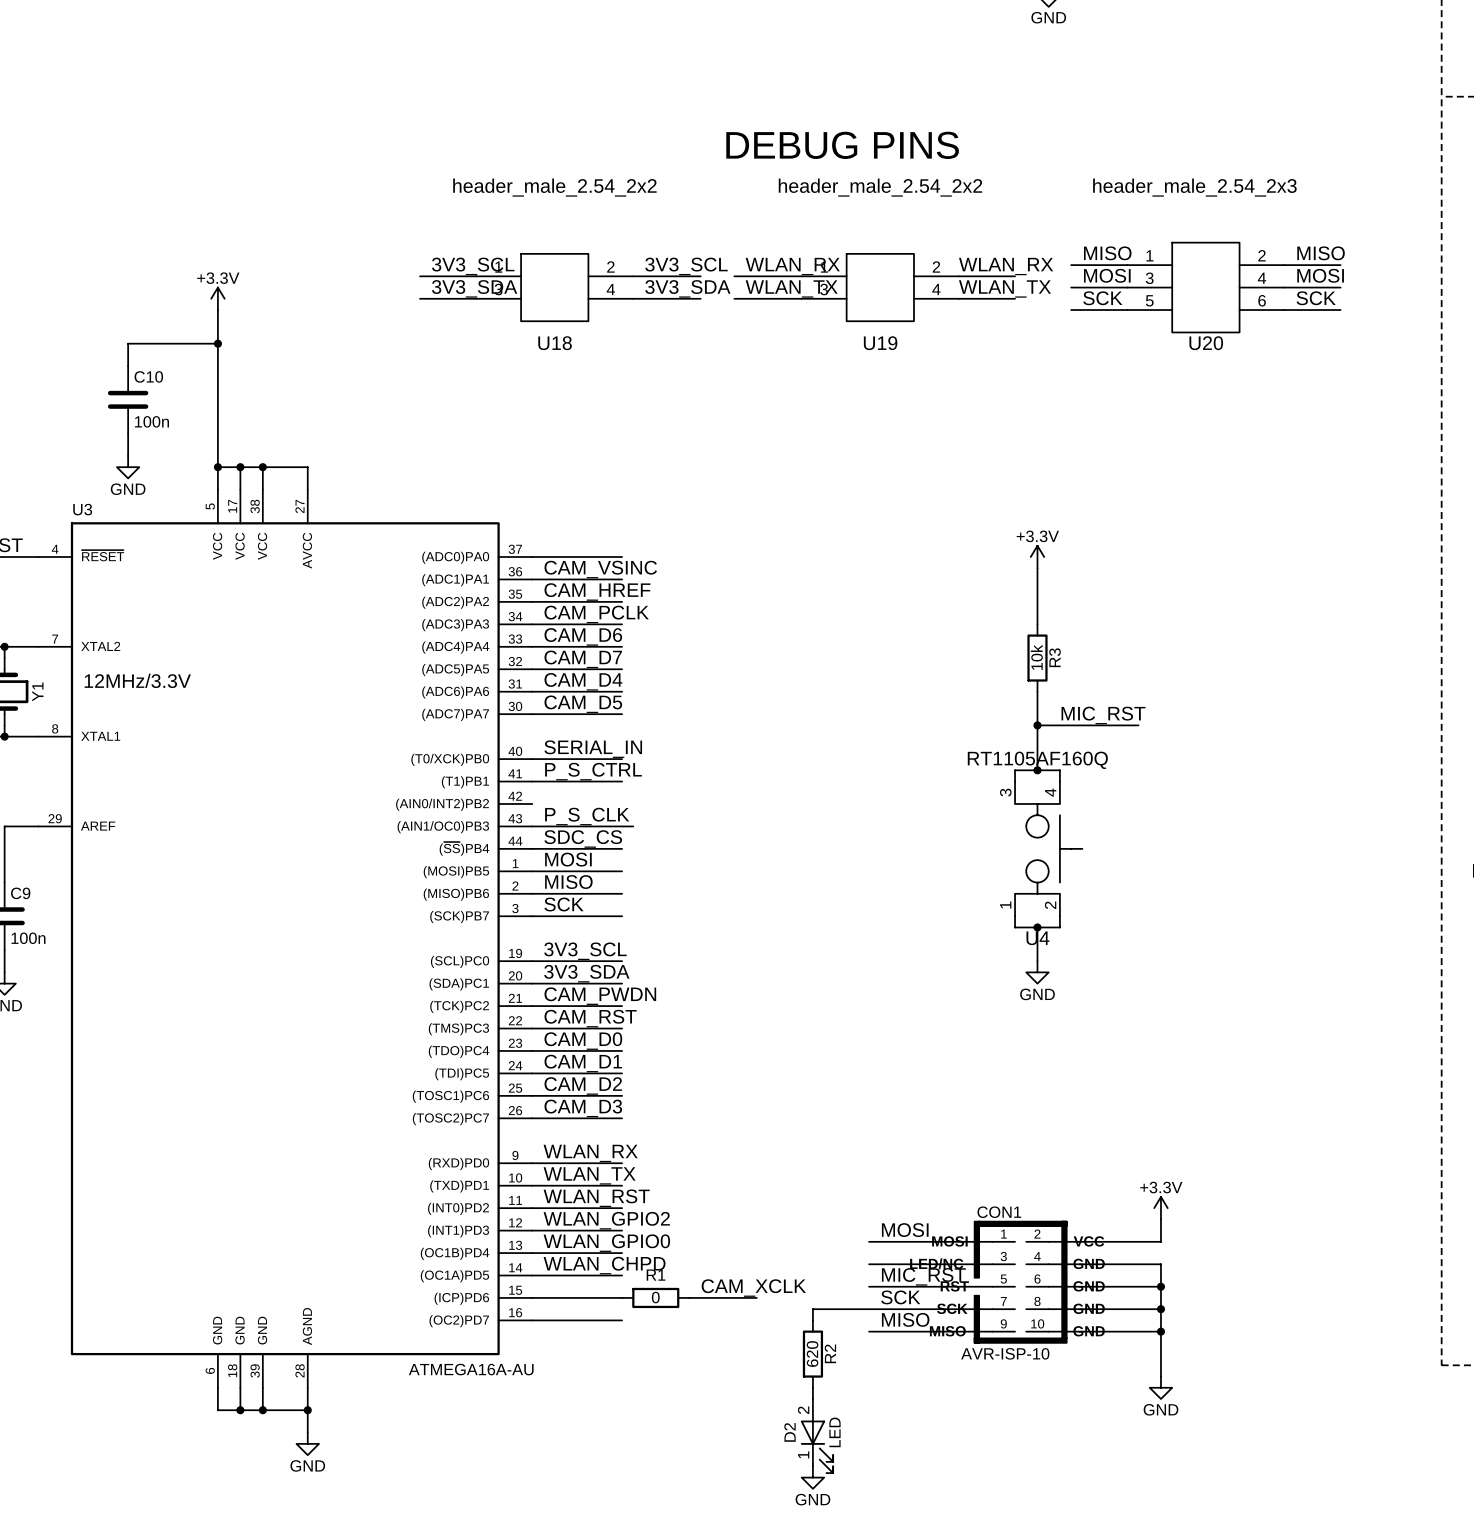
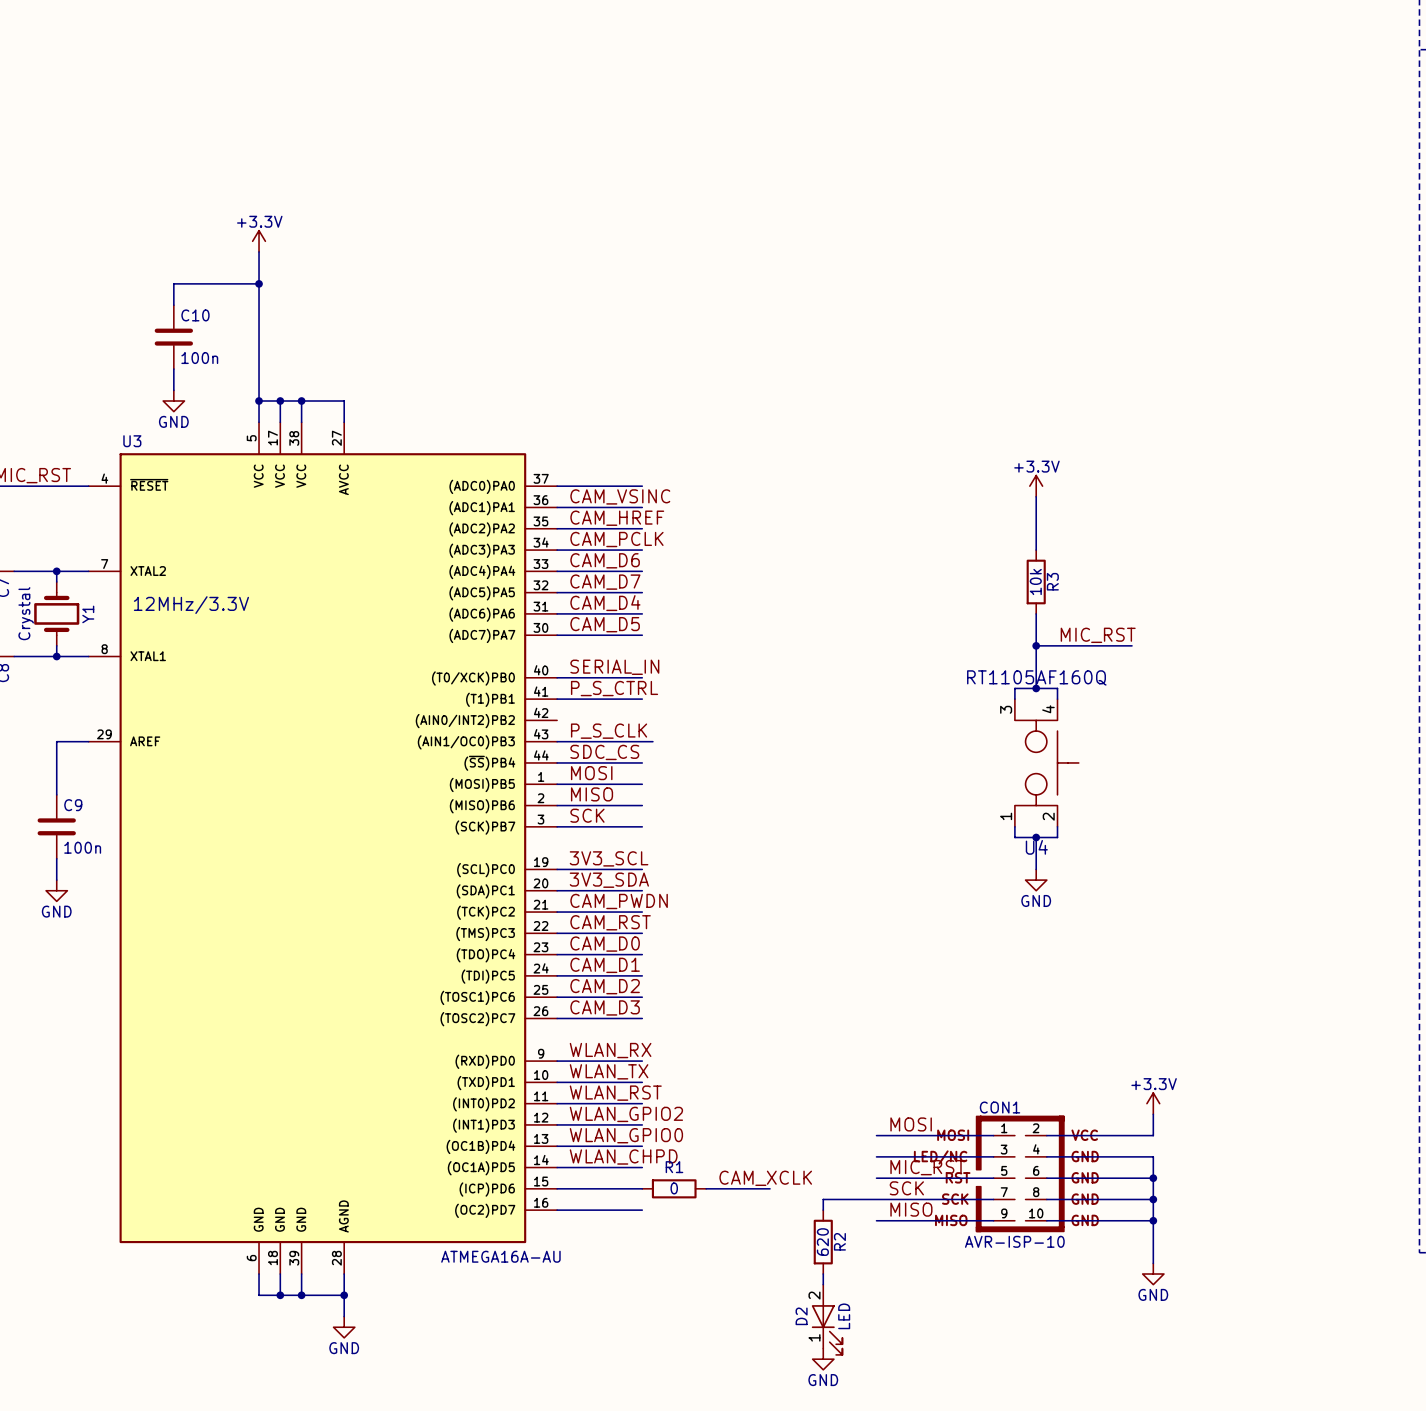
text: DEBUG PINS (842, 145) -> none
label: MISO (1107, 253) -> none
label: MISO (1321, 253) -> none
wire: (1071, 265) (1127, 265) -> none
wire: (1284, 265) (1340, 265) -> none
label: 3V3_SCL (473, 266) -> none
label: 3V3_SCL (686, 266) -> none
label: WLAN_RX (792, 266) -> none
label: WLAN_RX (1006, 266) -> none
label: MOSI (1107, 275) -> none
label: MOSI (1320, 275) -> none
wire: (420, 276) (476, 276) -> none
wire: (633, 276) (700, 276) -> none
wire: (734, 276) (801, 276) -> none
wire: (958, 276) (1015, 276) -> none
U18: header_male_2.54_2x2 (554, 287) -> none
U19: header_male_2.54_2x2 (880, 287) -> none
wire: (1071, 287) (1127, 287) -> none
U20: header_male_2.54_2x3 (1205, 287) -> none
wire: (1284, 287) (1340, 287) -> none
label: 3V3_SDA (474, 288) -> none
label: 3V3_SDA (687, 288) -> none
label: WLAN_TX (791, 288) -> none
label: WLAN_TX (1004, 288) -> none
wire: (420, 298) (476, 298) -> none
wire: (633, 298) (700, 298) -> none
wire: (734, 298) (801, 298) -> none
wire: (958, 298) (1015, 298) -> none
label: SCK (1102, 298) -> none
label: SCK (1316, 298) -> none
wire: (1071, 310) (1127, 310) -> none
wire: (1284, 310) (1340, 310) -> none

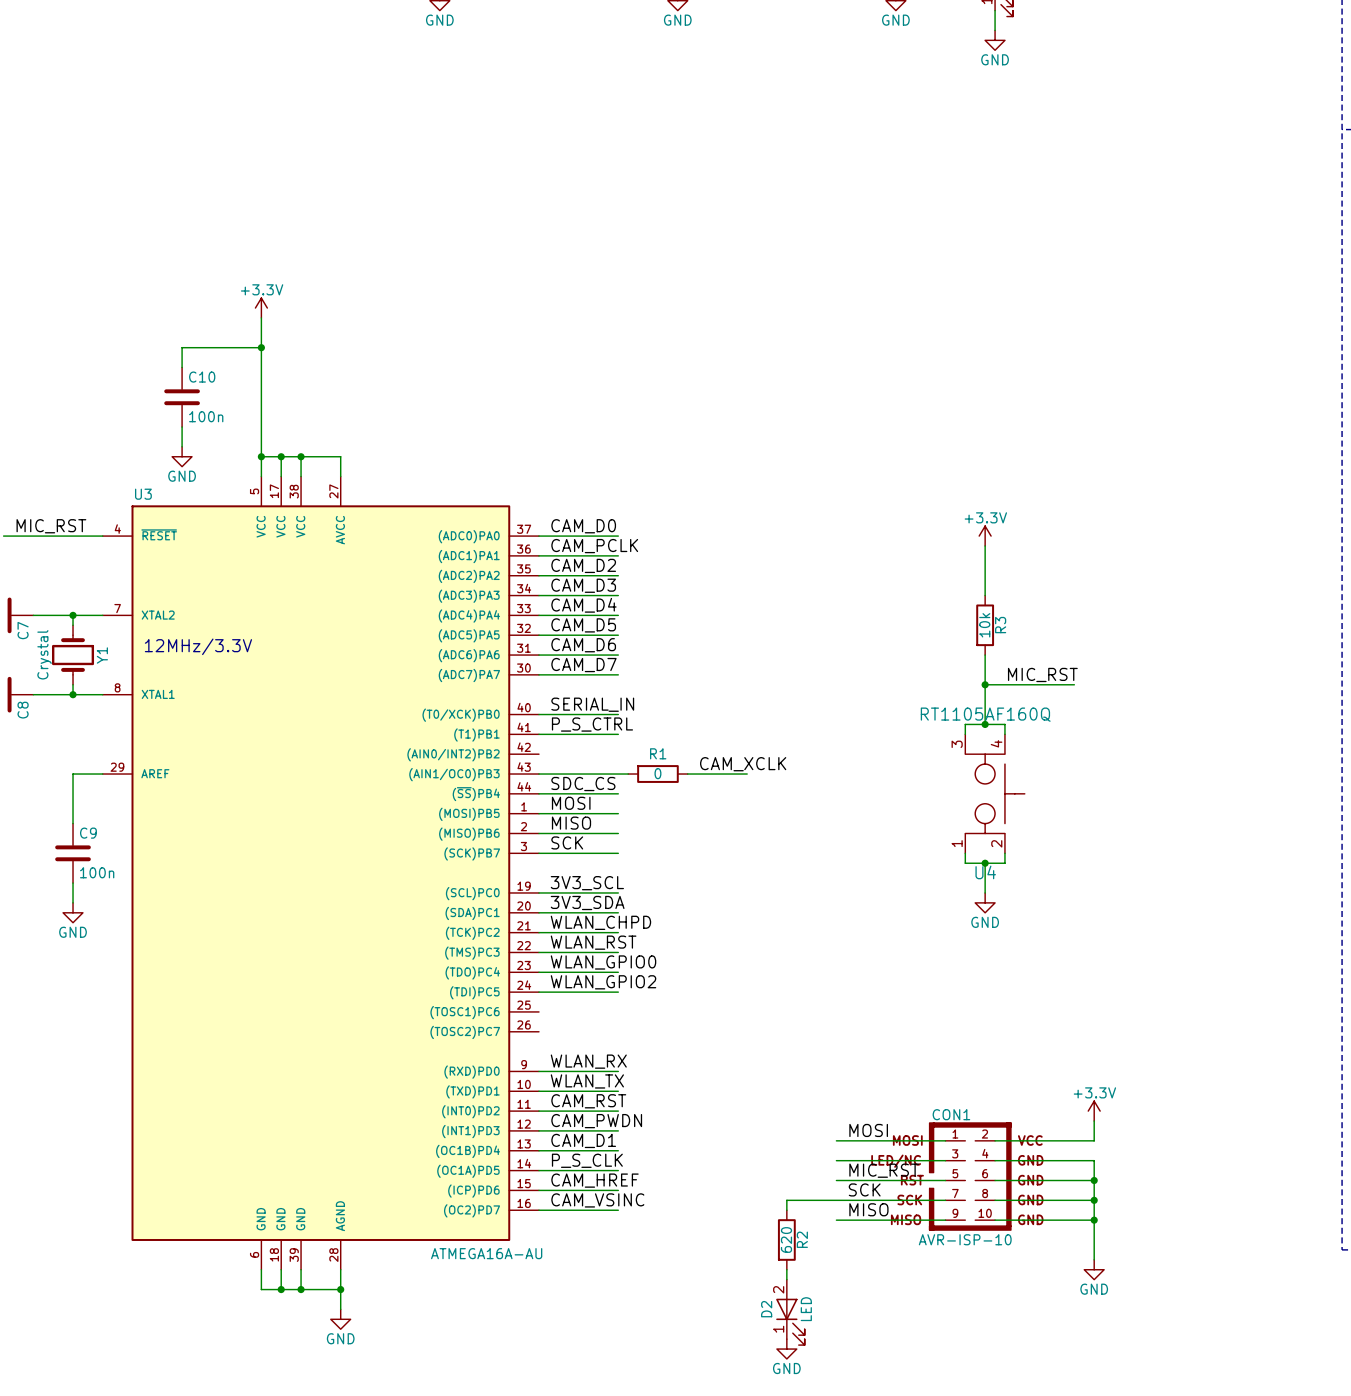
label: none -> CAM_D0 (583, 526)
label: CAM_VSINC (620, 496) -> CAM_PCLK (594, 546)
label: CAM_HREF (617, 518) -> CAM_D2 (583, 565)
label: CAM_PCLK (616, 539) -> CAM_D3 (583, 585)
label: CAM_D6 (605, 560) -> CAM_D4 (583, 605)
label: CAM_D7 (605, 582) -> CAM_D5 (583, 625)
label: CAM_D4 (605, 603) -> CAM_D6 (583, 645)
label: CAM_D5 (605, 624) -> CAM_D7 (583, 665)
label: P_S_CLK (609, 731) -> none
label: none -> CAM_XCLK (743, 764)
wire: none -> (687, 774) (747, 774)
label: CAM_PWDN (619, 901) -> WLAN_CHPD (600, 922)
label: CAM_RST (610, 922) -> WLAN_RST (593, 942)
label: CAM_D0 (605, 944) -> WLAN_GPIO0 (603, 962)
label: CAM_D1 (605, 965) -> WLAN_GPIO2 (603, 982)
label: CAM_D2 (605, 986) -> none
wire: (557, 997) (642, 997) -> none
label: CAM_D3 (605, 1007) -> none
wire: (557, 1018) (642, 1018) -> none
label: WLAN_RST (615, 1093) -> CAM_RST (588, 1101)
label: WLAN_GPIO2 (626, 1114) -> CAM_PWDN (596, 1121)
label: WLAN_GPIO0 (626, 1135) -> CAM_D1 (583, 1140)
label: WLAN_CHPD (623, 1157) -> P_S_CLK (587, 1160)
label: none -> CAM_HREF (595, 1180)
label: CAM_XCLK (765, 1178) -> none
R1 position: (674, 1188) -> (657, 774)
wire: (706, 1188) (770, 1188) -> none
label: none -> CAM_VSINC (597, 1200)

